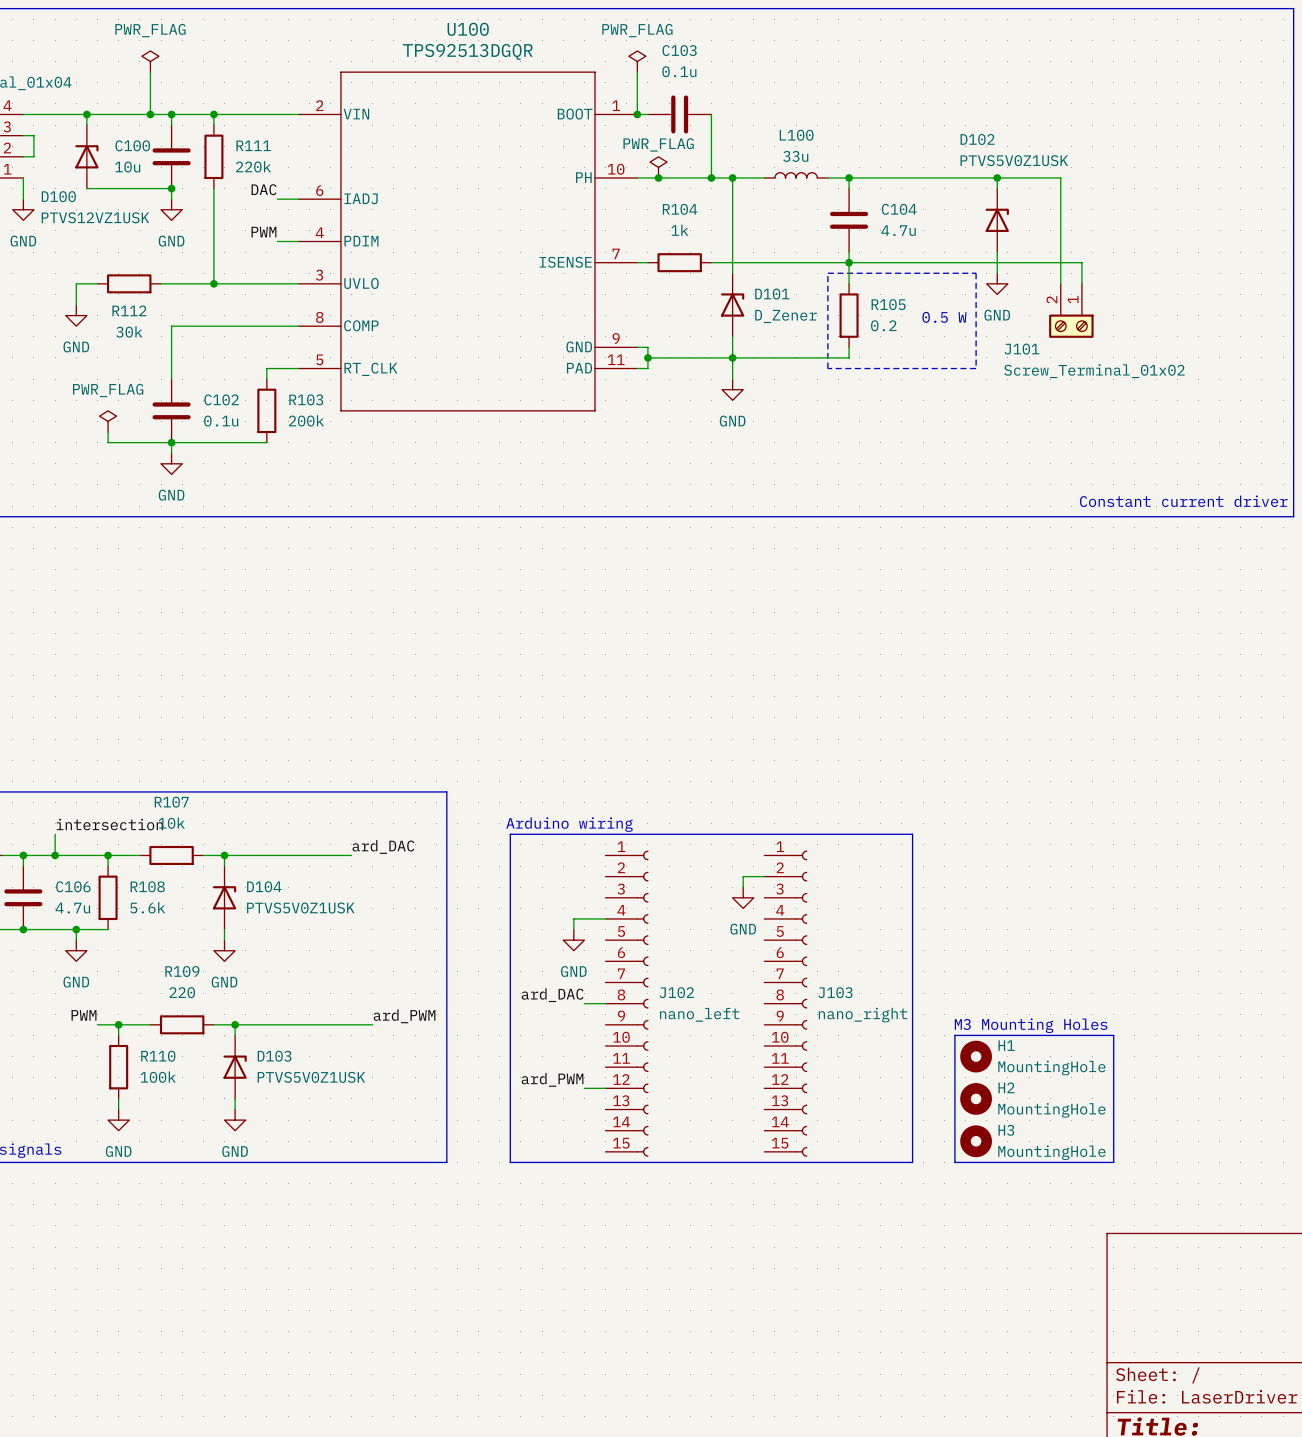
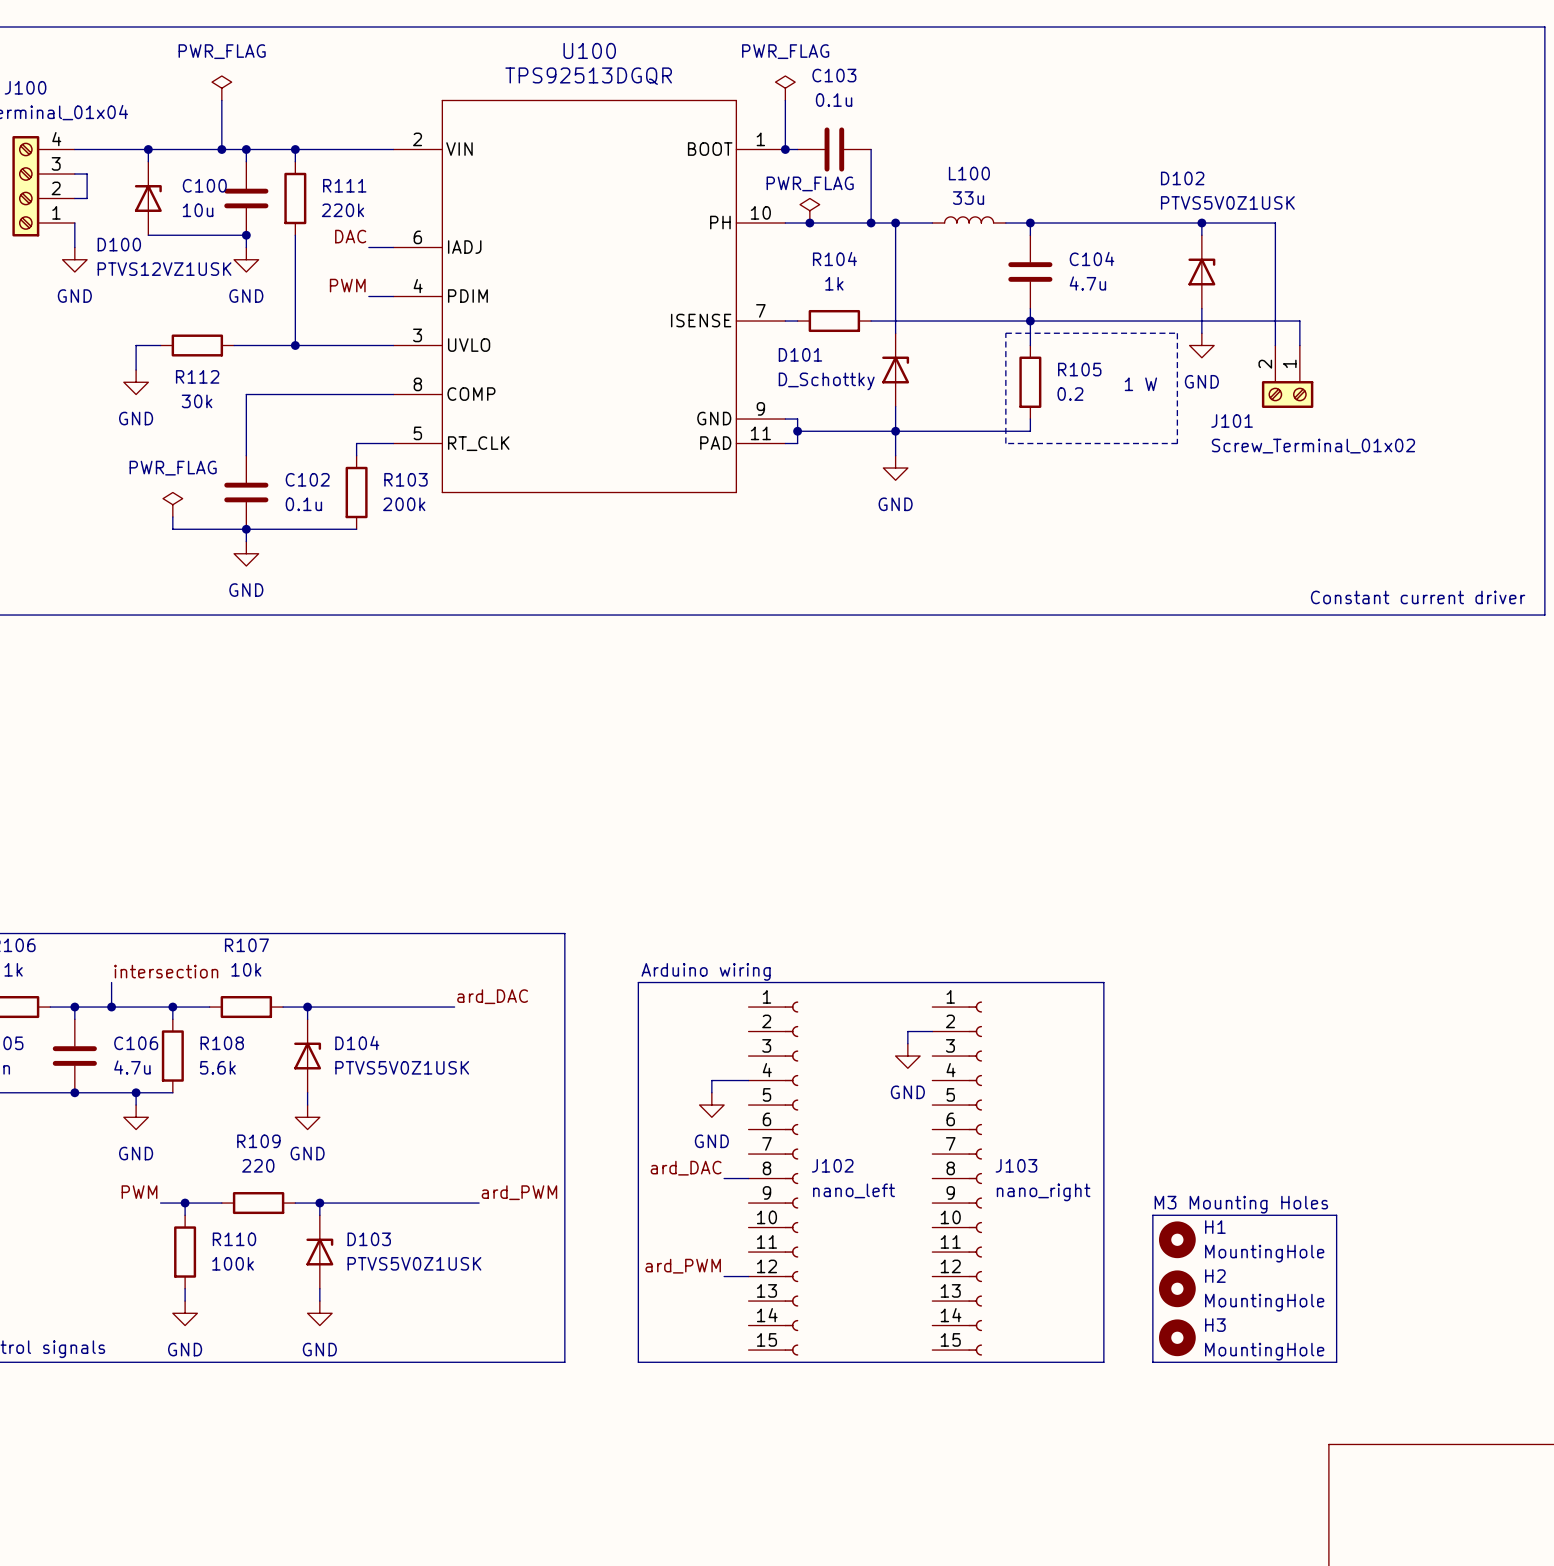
D101 name position: D101 (772, 294) -> D101 (800, 354)
D101 value: D_Zener (786, 316) -> D_Schottky (826, 381)
text: 0.5 W (944, 317) -> 1 W (1140, 384)

